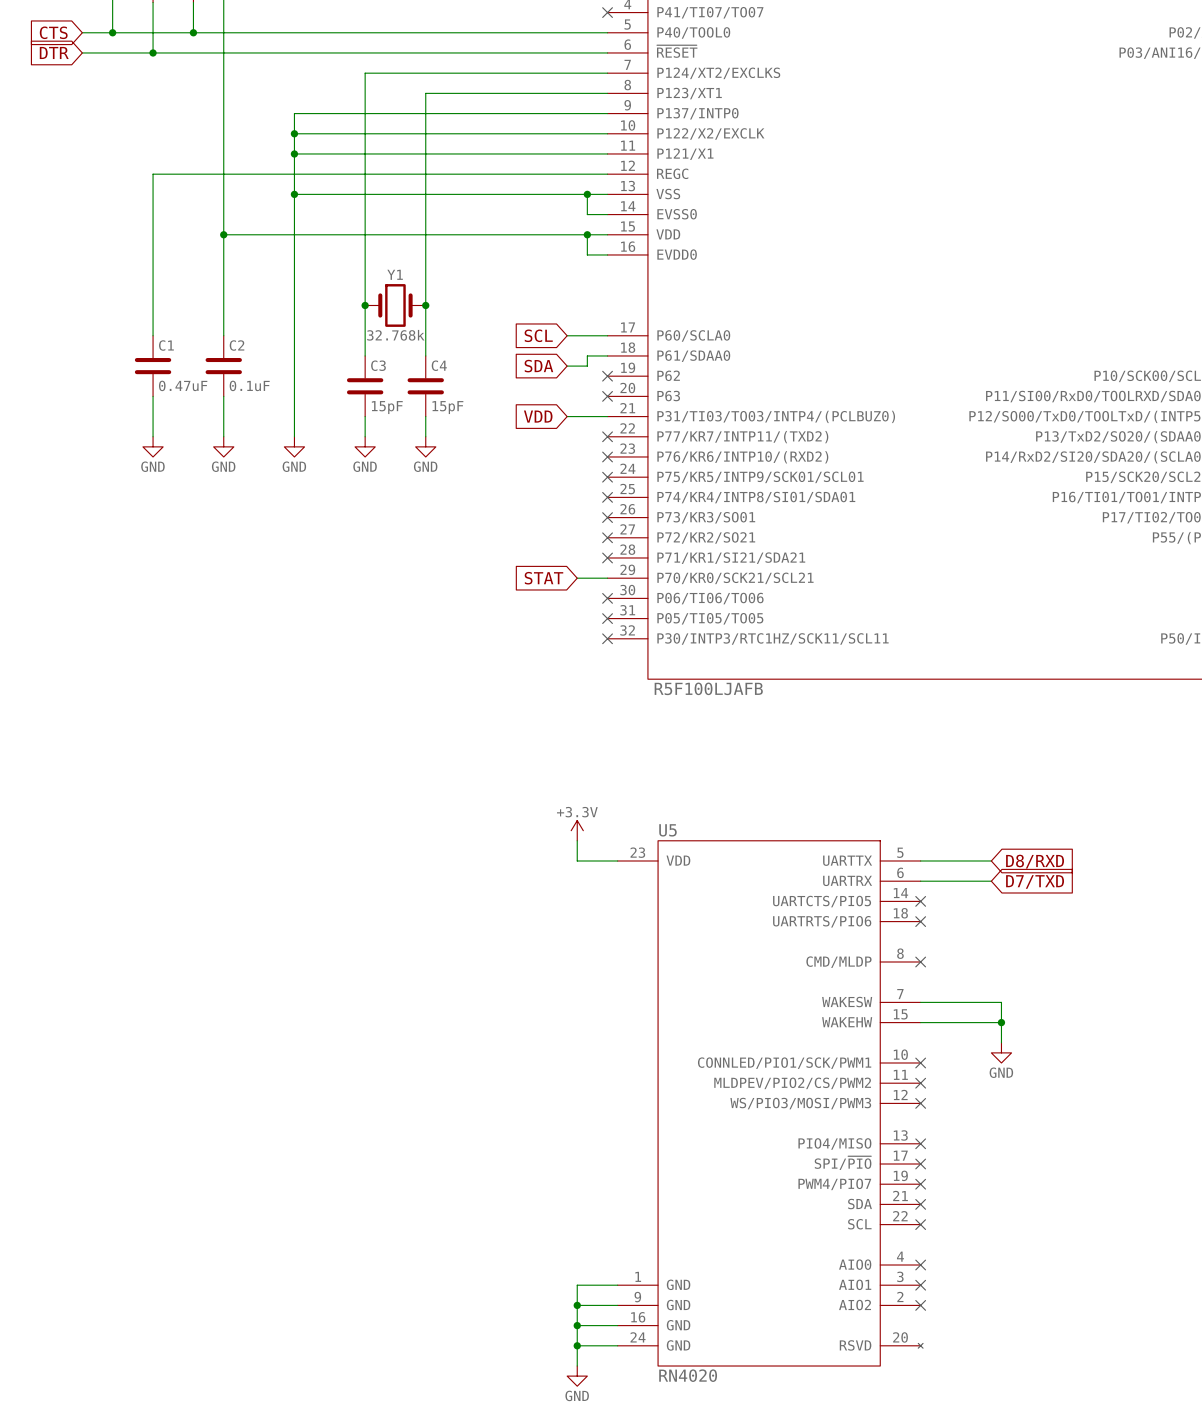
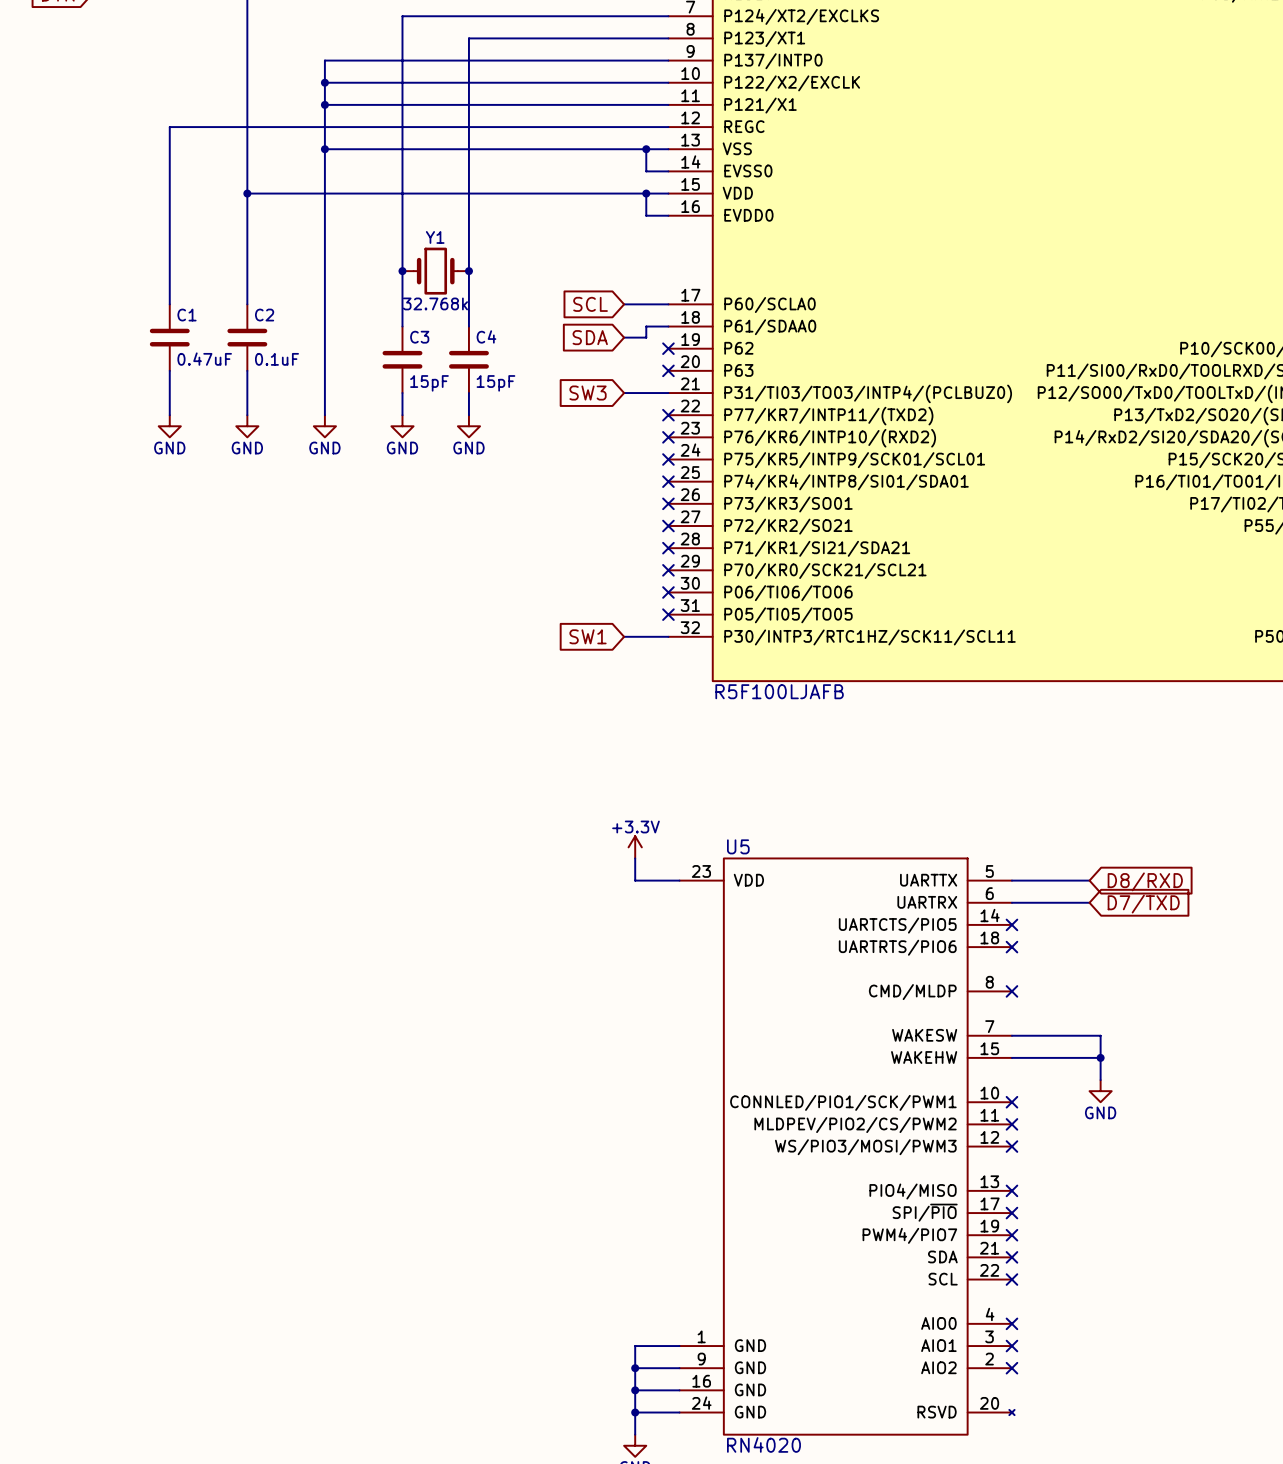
global label: VDD (538, 416) -> SW3 (588, 393)
global label: STAT (543, 578) -> none
wire: (577, 578) (607, 578) -> none
no-connect mark: none -> (668, 570)
global label: none -> SW1 (588, 636)
wire: none -> (624, 636) (668, 636)
no-connect mark: (607, 638) -> none

